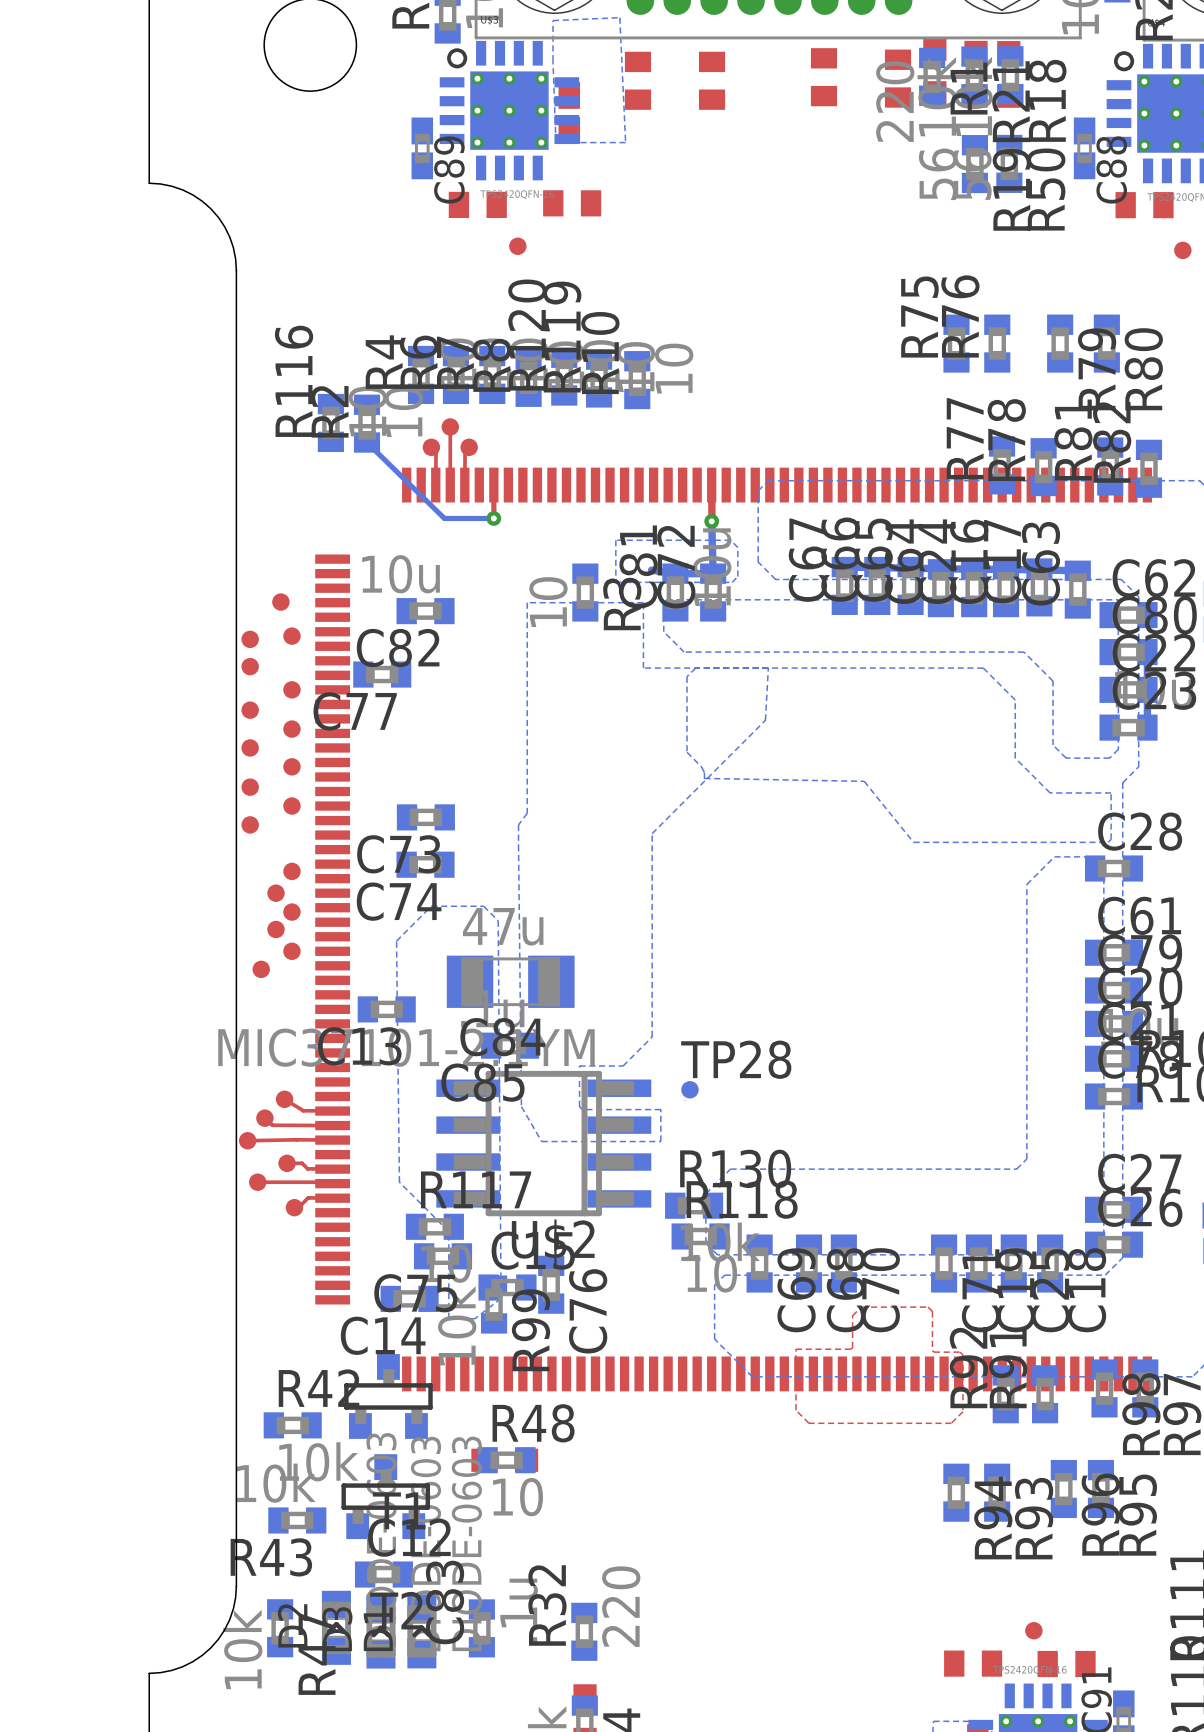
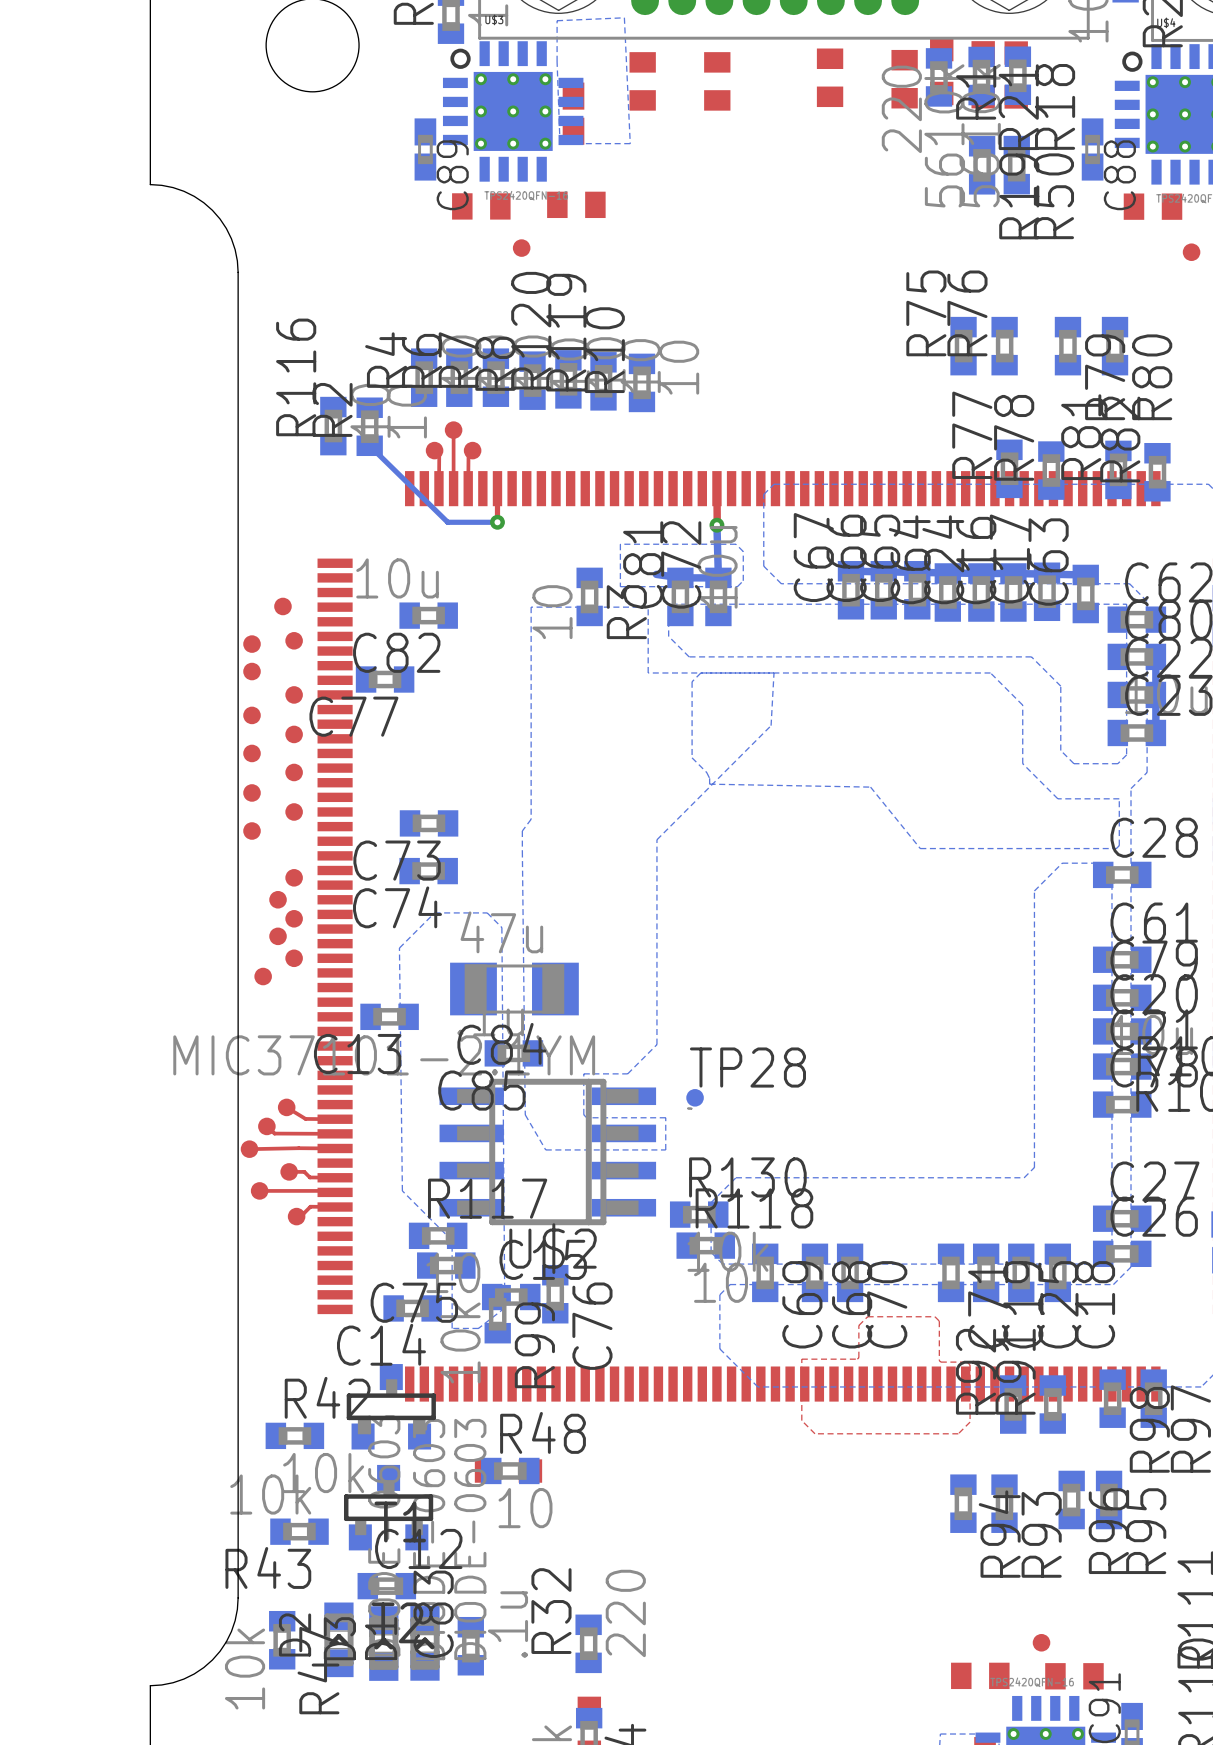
C83 position: (481, 1628) -> (470, 1646)

